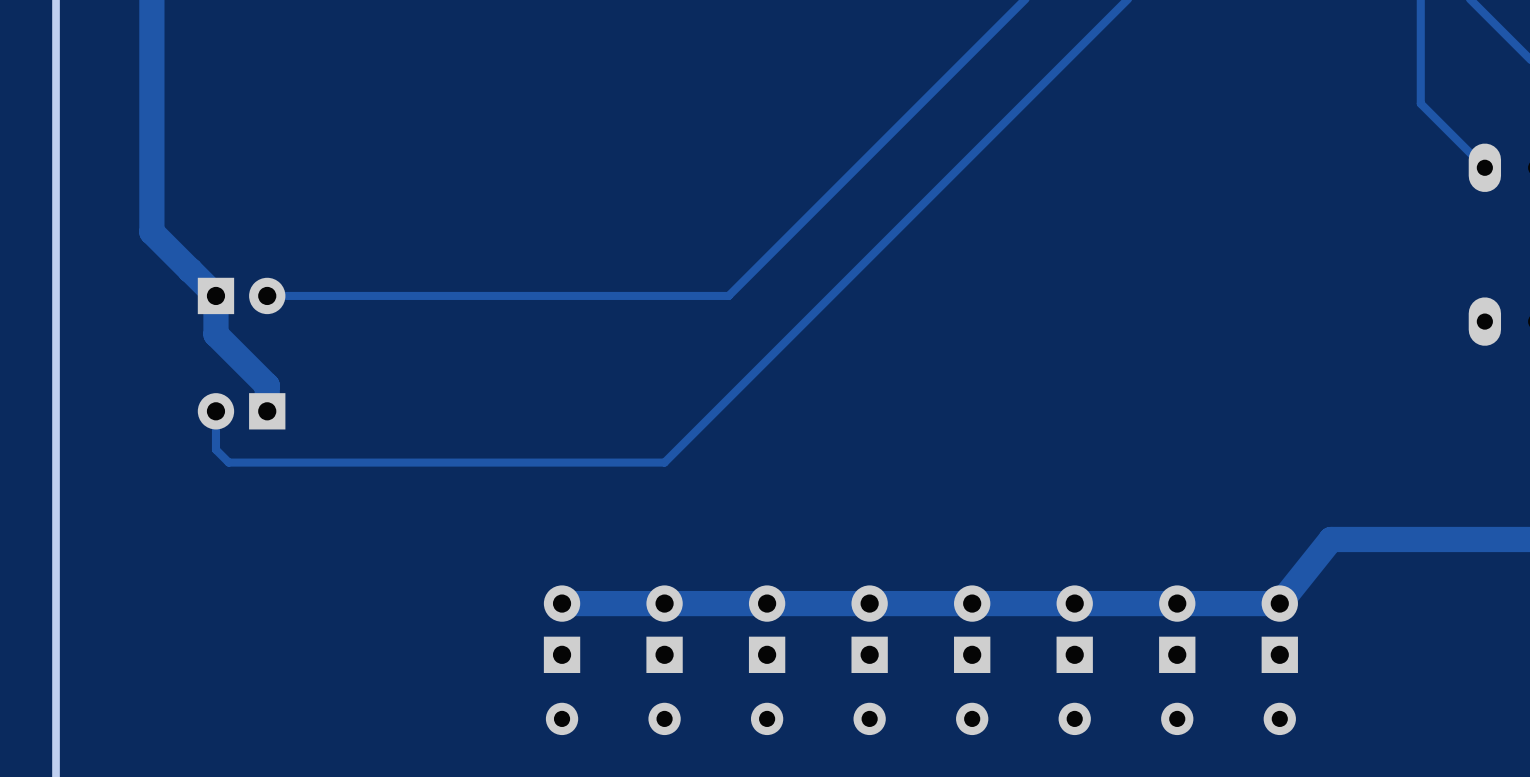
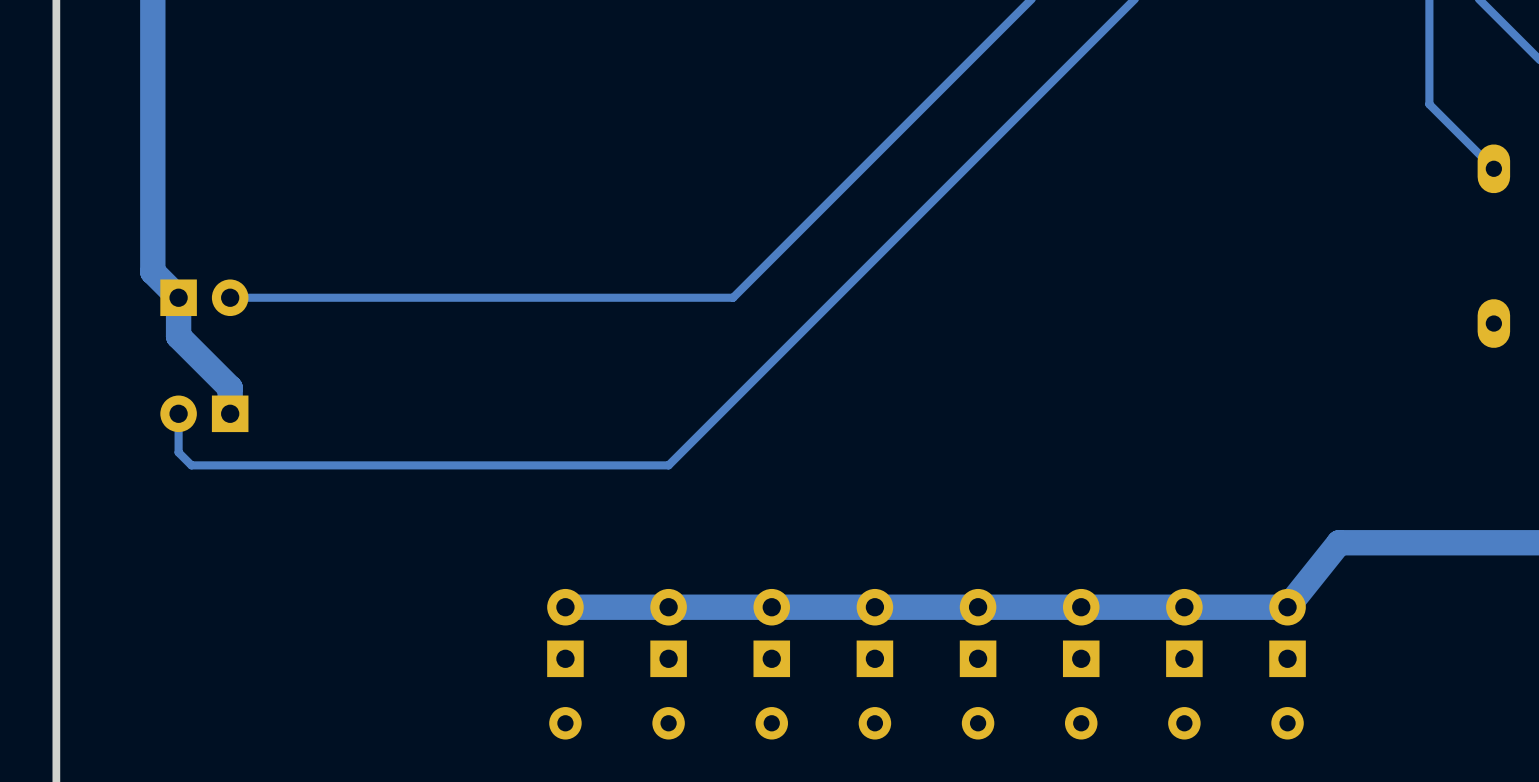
track: (151, 232) (190, 270) -> (152, 233) (152, 271) (178, 297) (178, 336) (230, 388) (230, 413)
track: (190, 270) (215, 295) (215, 334) (267, 385) (267, 411) -> none
part position: (241, 295) -> (204, 297)
track: none -> (268, 297) (230, 297)
track: (215, 411) (215, 449) (228, 462) -> (178, 413) (178, 452) (191, 465) (230, 465)
part position: (241, 411) -> (204, 413)

